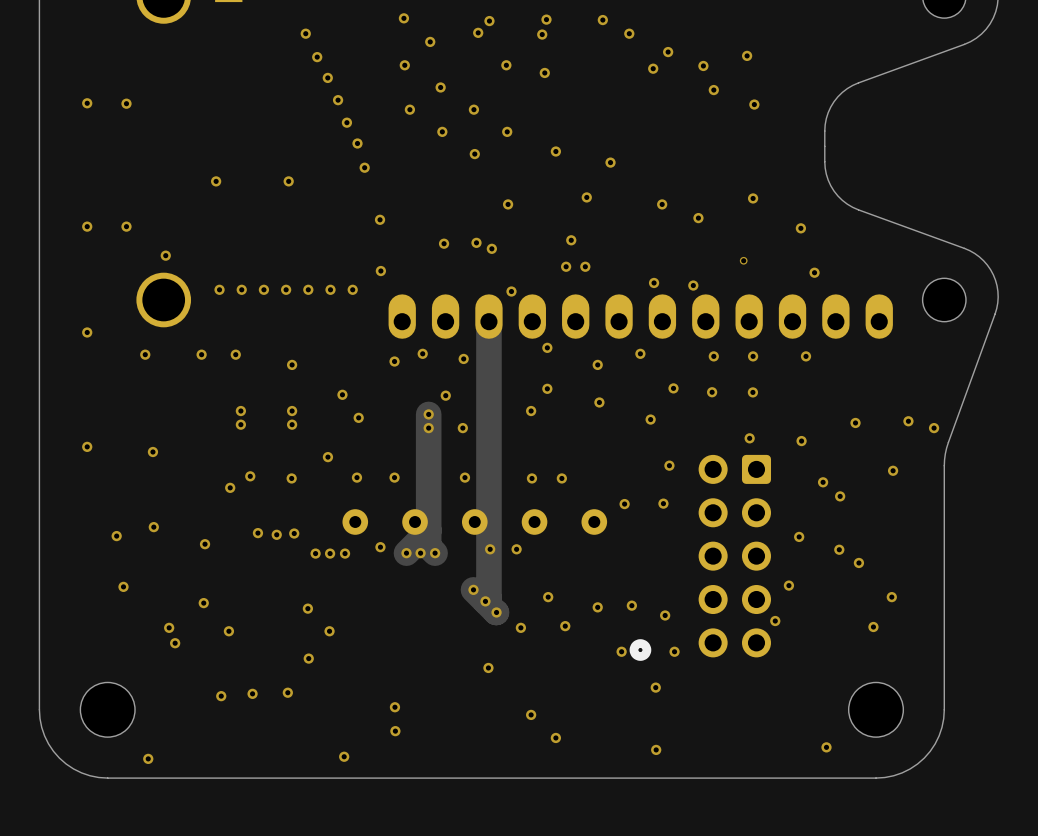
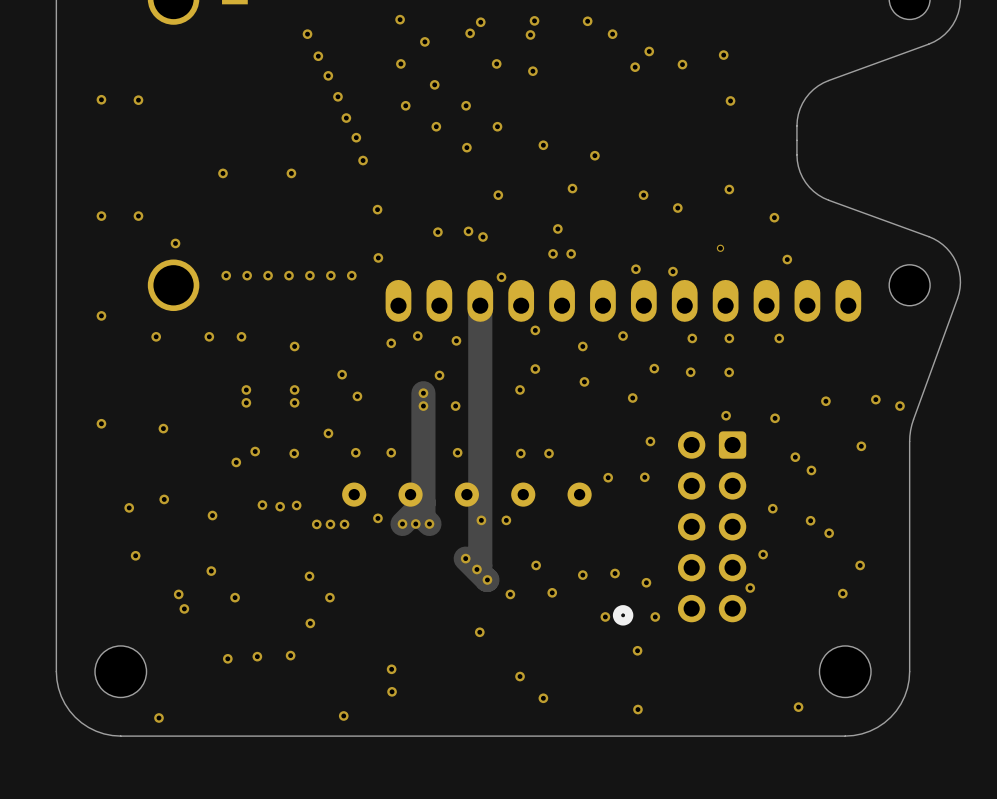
via: (713, 90) -> none

